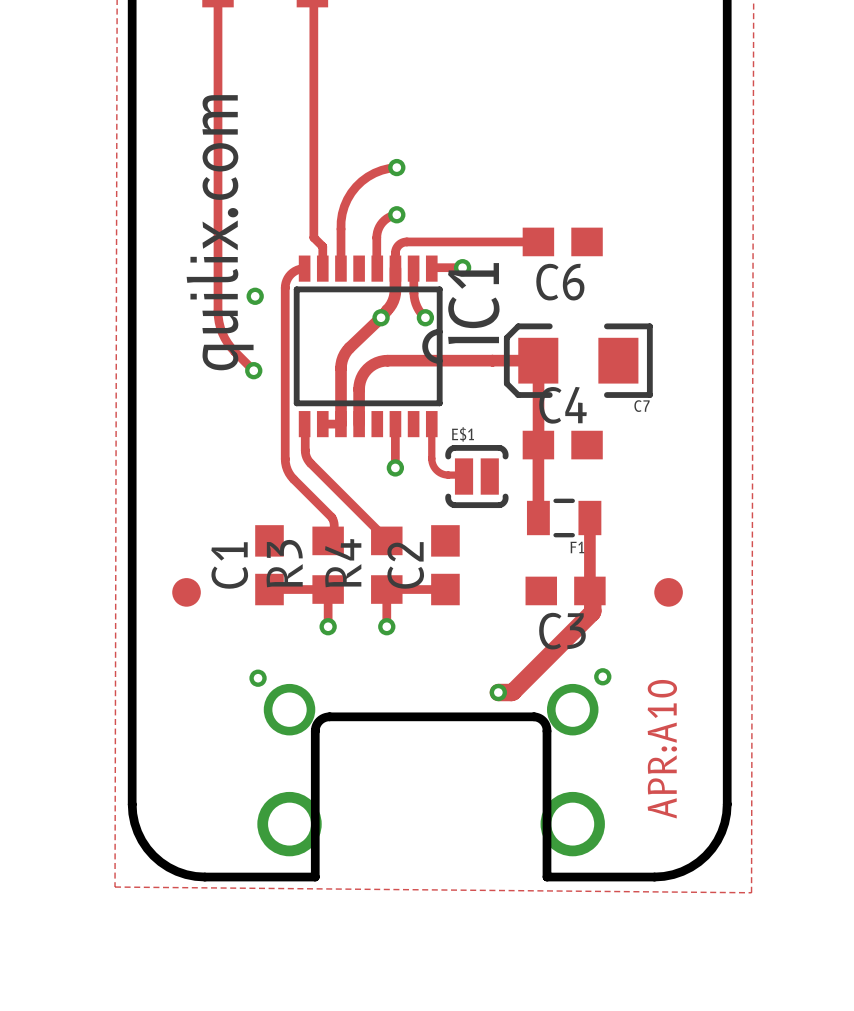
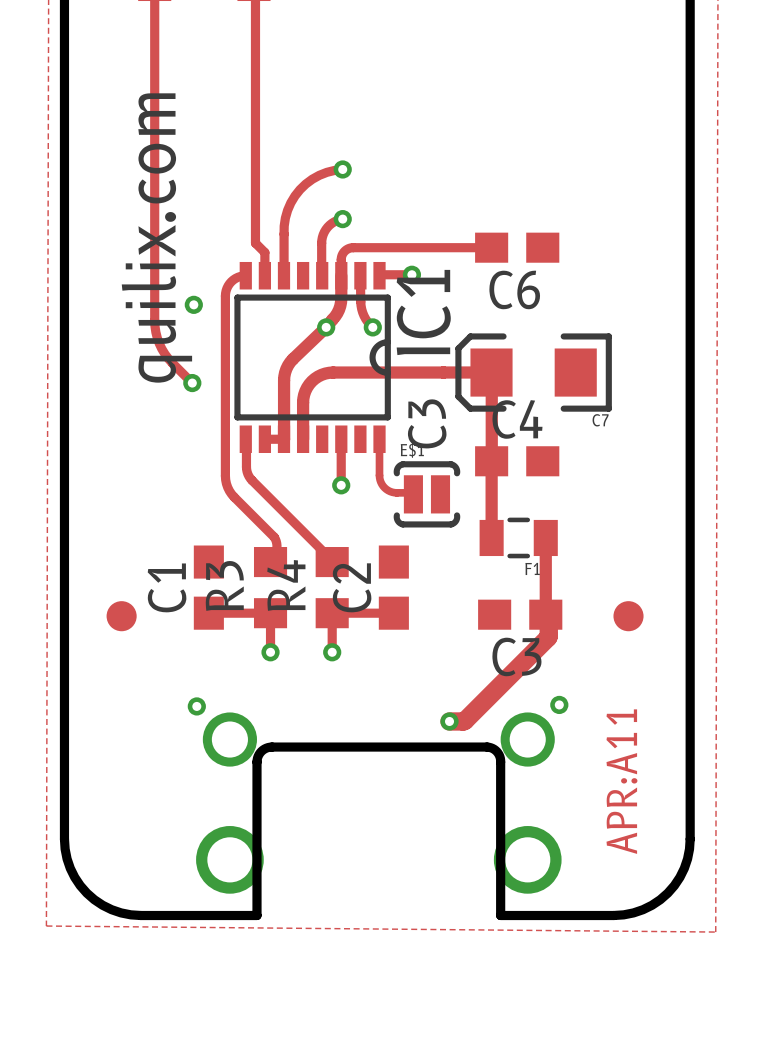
text: none -> C3 (427, 423)
text: APR:A10 (662, 749) -> APR:A11 (621, 781)

